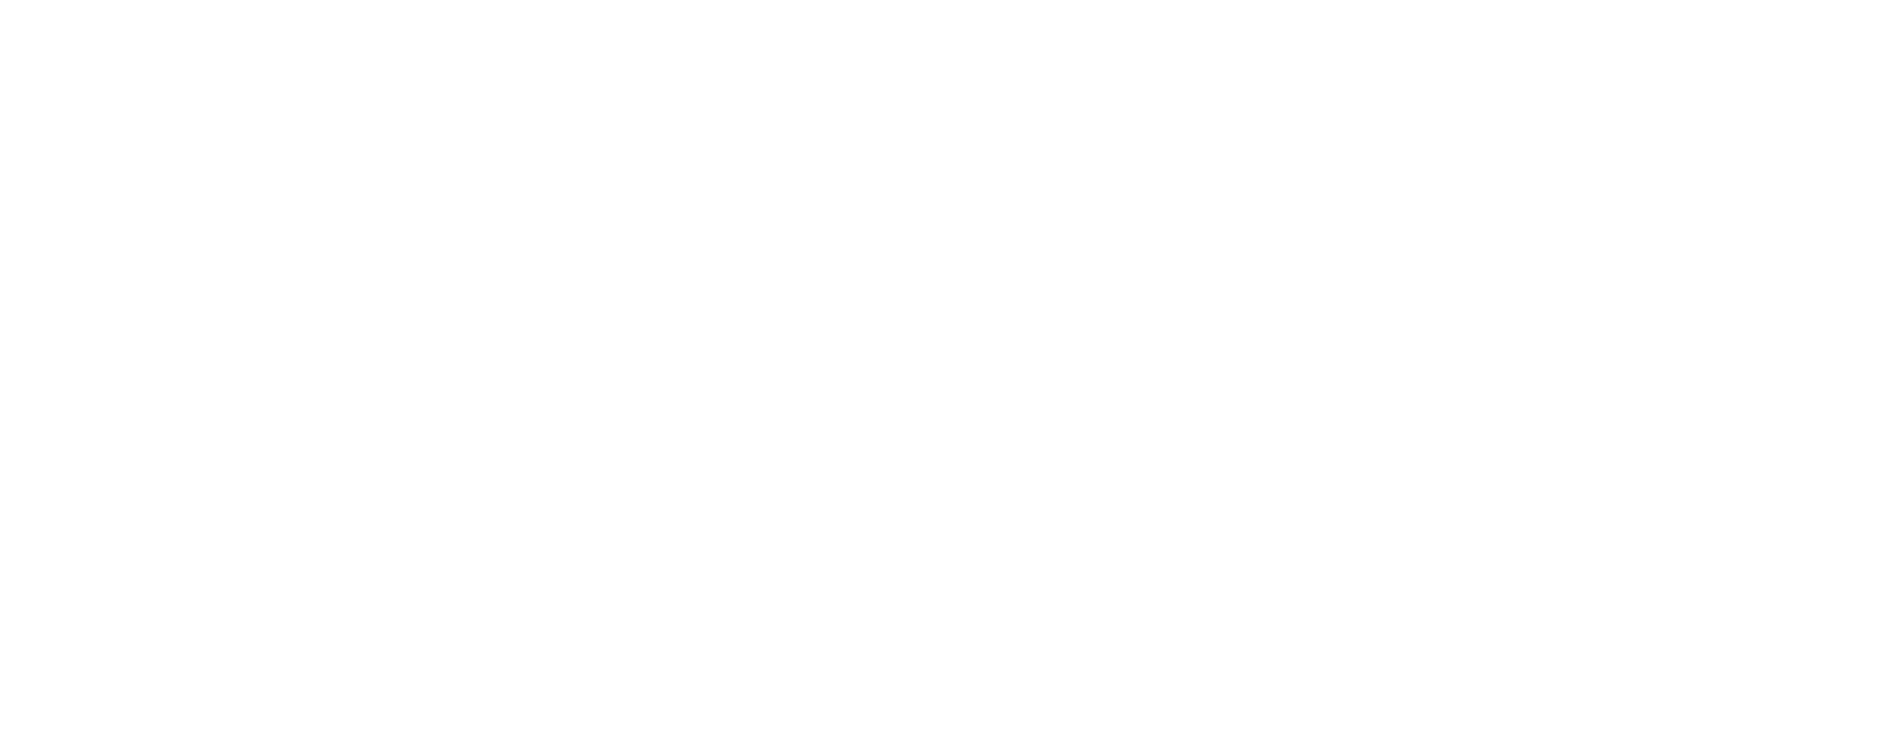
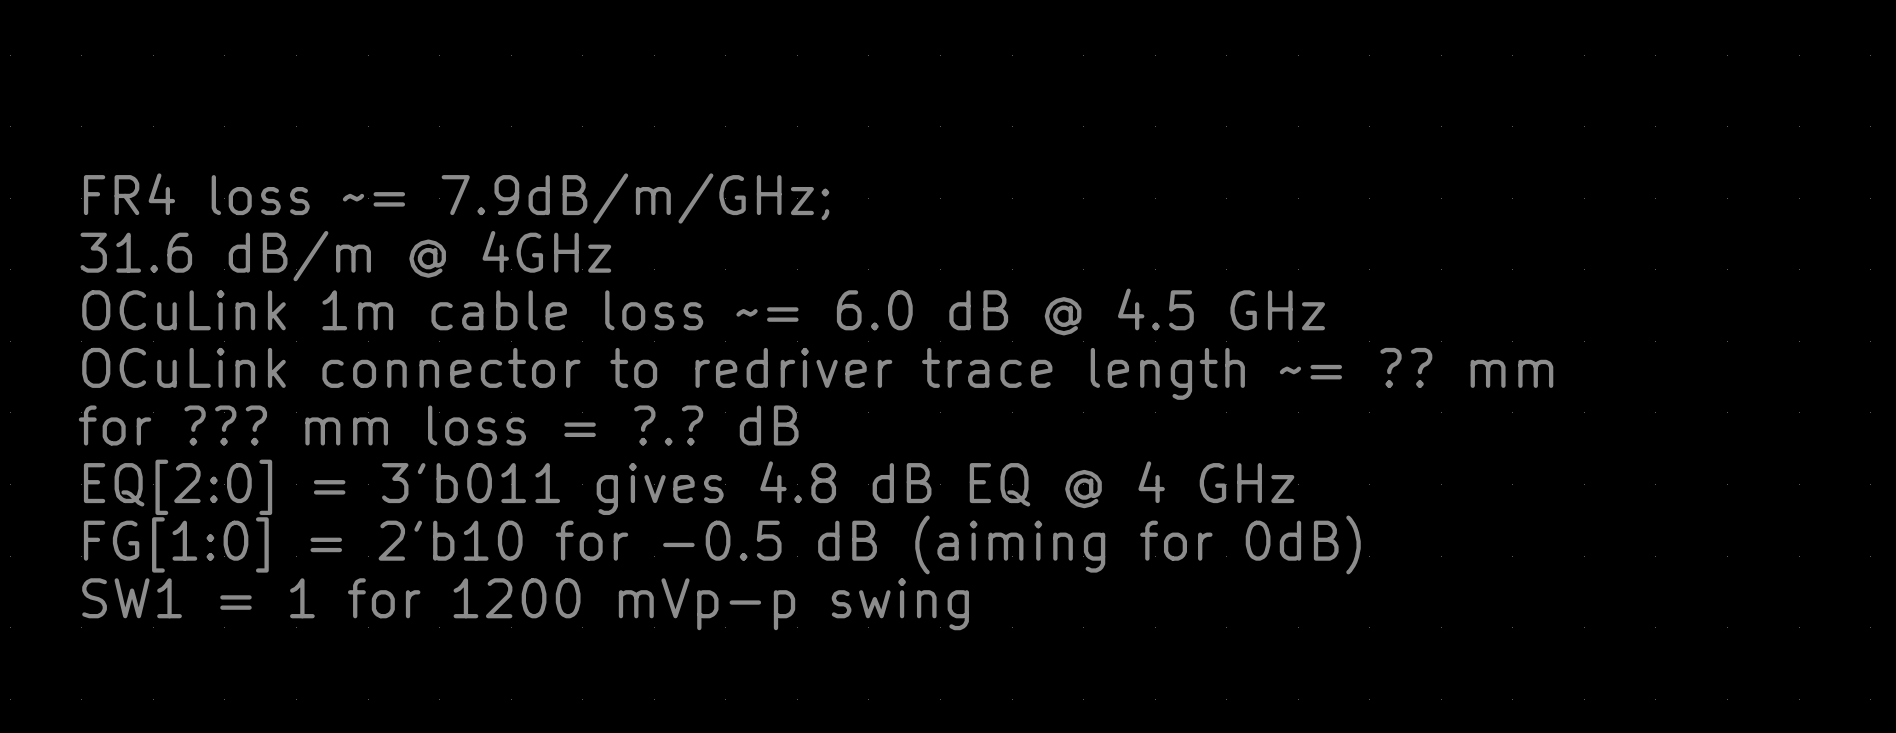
text: none -> FR4 loss ~= 7.9dB/m/GHz; (456, 198)
text: none -> 31.6 dB/m @ 4GHz (345, 256)
text: none -> OCuLink 1m cable loss ~= 6.0 dB @ 4.5 GHz (703, 311)
text: none -> OCuLink connector to redriver trace length ~= ?? mm (817, 373)
text: none -> for ??? mm loss = ?.? dB (438, 425)
text: none -> EQ[2:0] = 3'b011 gives 4.8 dB EQ @ 4 GHz (689, 487)
text: none -> FG[1:0] = 2'b10 for -0.5 dB (aiming for 0dB) (722, 544)
text: none -> SW1 = 1 for 1200 mVp-p swing (525, 604)

